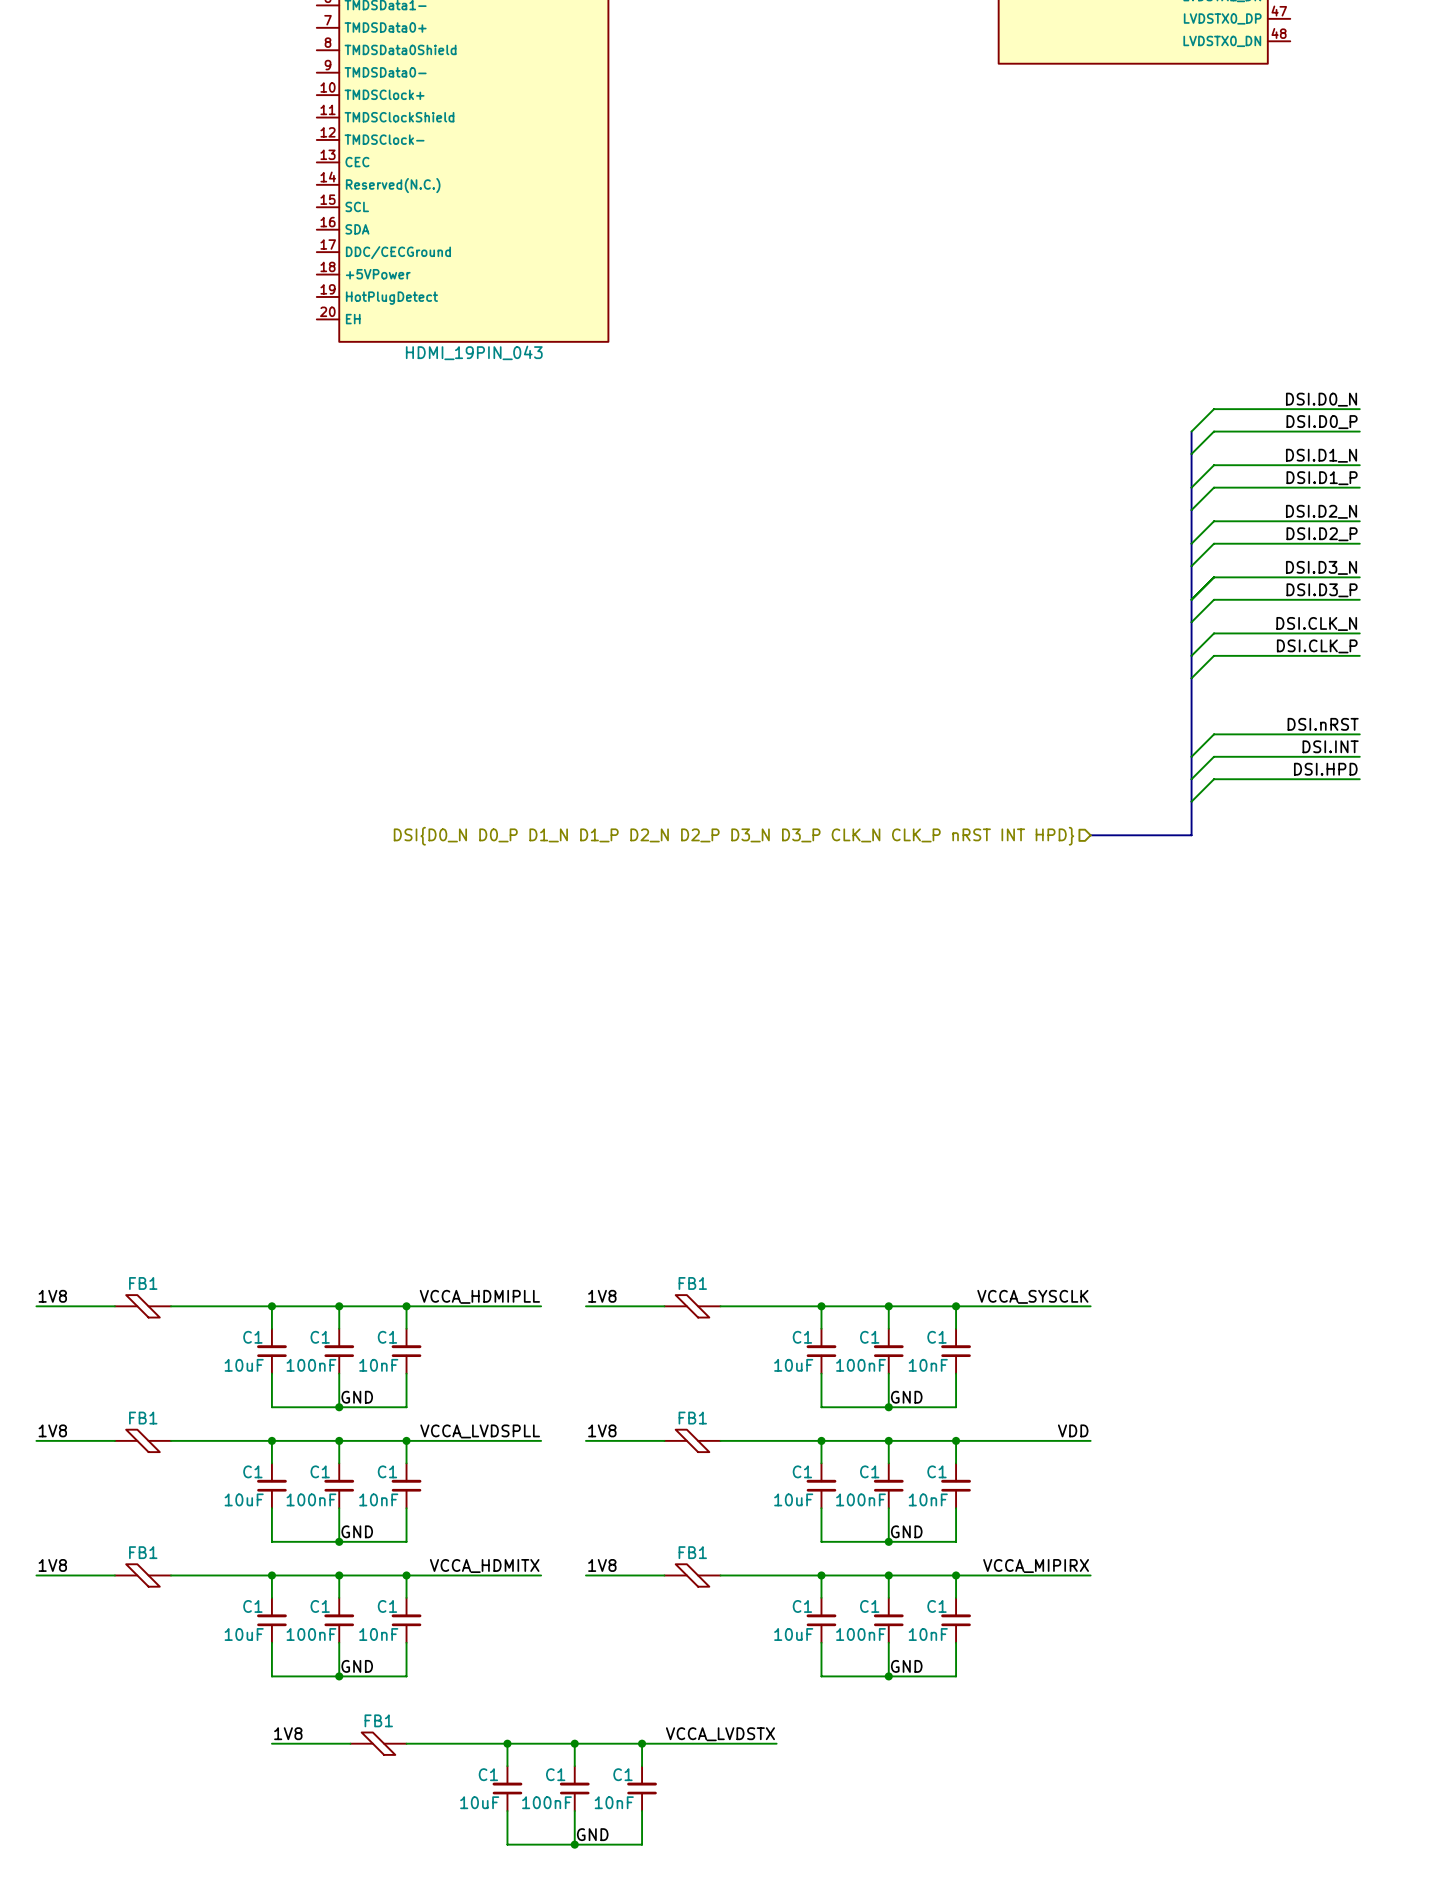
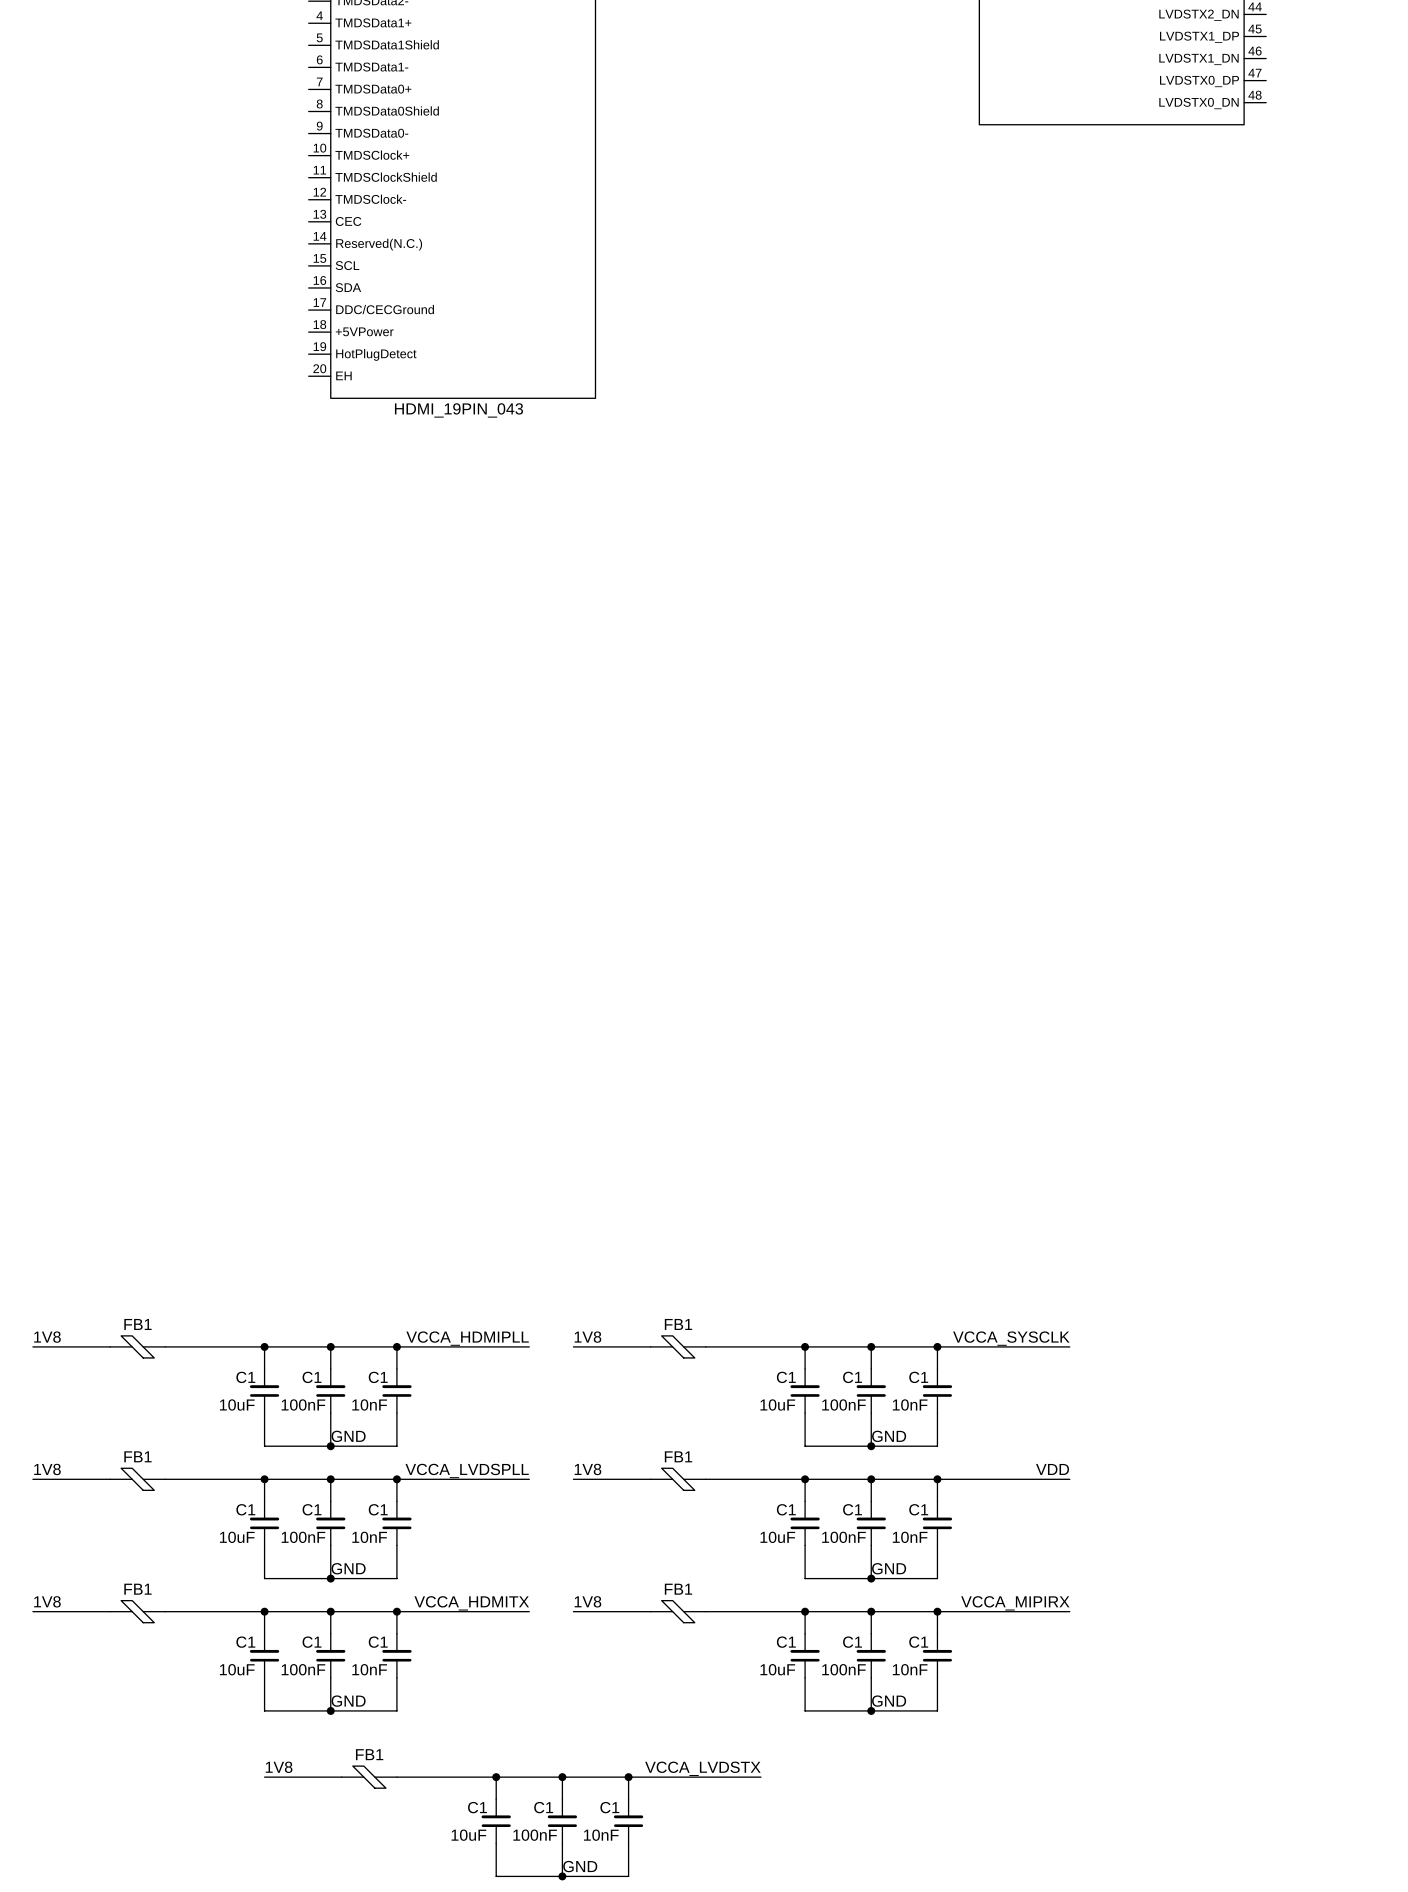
label: DSI.D0_N (1321, 399) -> none
wire: (1359, 409) (1213, 409) (1191, 431) -> none
label: DSI.D0_P (1322, 422) -> none
bus: (1191, 431) (1191, 835) (1090, 835) -> none
wire: (1359, 431) (1213, 431) (1191, 453) -> none
label: DSI.D1_N (1321, 455) -> none
wire: (1359, 465) (1213, 465) (1191, 487) -> none
label: DSI.D1_P (1322, 478) -> none
wire: (1359, 487) (1213, 487) (1191, 510) -> none
label: DSI.D2_N (1321, 511) -> none
wire: (1359, 521) (1213, 521) (1191, 543) -> none
label: DSI.D2_P (1322, 534) -> none
wire: (1359, 543) (1213, 543) (1191, 566) -> none
label: DSI.D3_N (1321, 567) -> none
wire: (1359, 577) (1213, 577) (1191, 599) -> none
label: DSI.D3_P (1322, 590) -> none
wire: (1359, 599) (1213, 599) (1191, 622) -> none
label: DSI.CLK_N (1316, 623) -> none
wire: (1359, 633) (1213, 633) (1191, 655) -> none
label: DSI.CLK_P (1317, 646) -> none
wire: (1359, 655) (1213, 655) (1191, 678) -> none
label: DSI.nRST (1323, 724) -> none
wire: (1359, 734) (1213, 734) (1191, 756) -> none
label: DSI.INT (1330, 746) -> none
wire: (1359, 756) (1213, 756) (1191, 779) -> none
label: DSI.HPD (1325, 769) -> none
wire: (1359, 779) (1213, 779) (1191, 801) -> none
hierarchical label: DSI{D0_N D0_P D1_N D1_P D2_N D2_P D3_N D3_P CLK_N CLK_P nRST INT HPD} (733, 836) -> none

